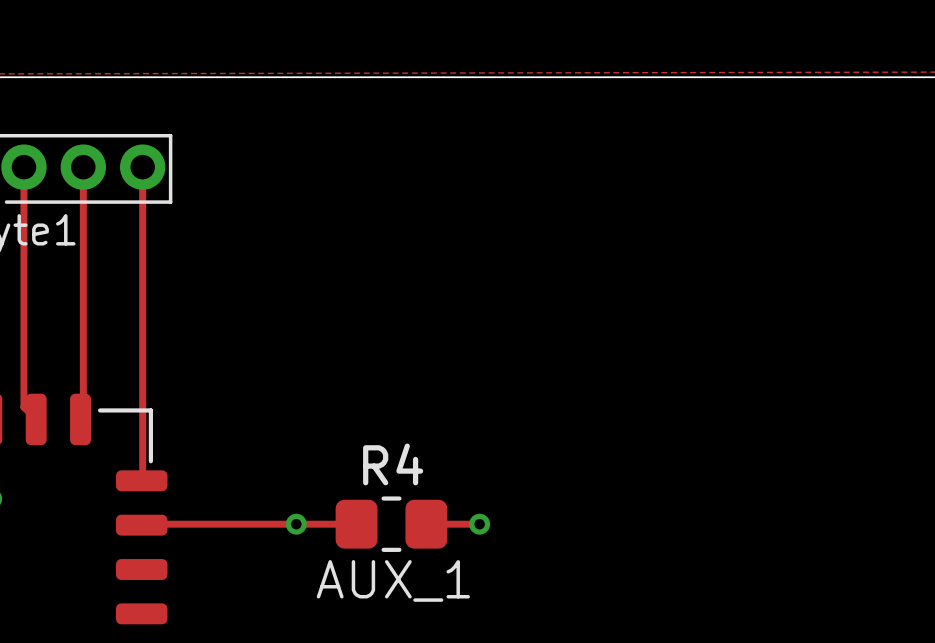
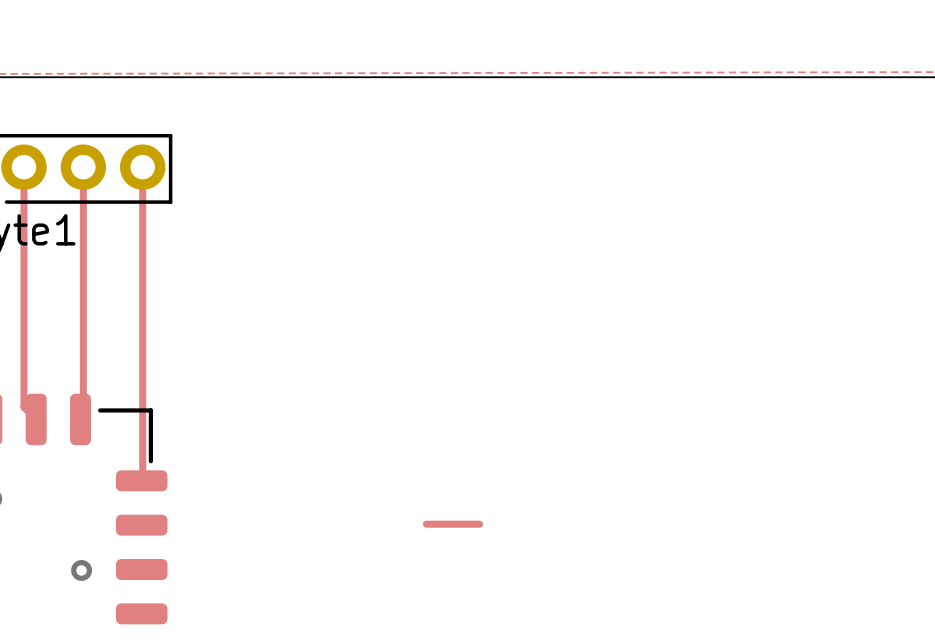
track: (142, 524) (356, 524) -> none
via: (296, 524) -> none
R4: (391, 524) -> none
via: (479, 524) -> none
via: none -> (81, 570)
text: AUX_1 (393, 580) -> none

